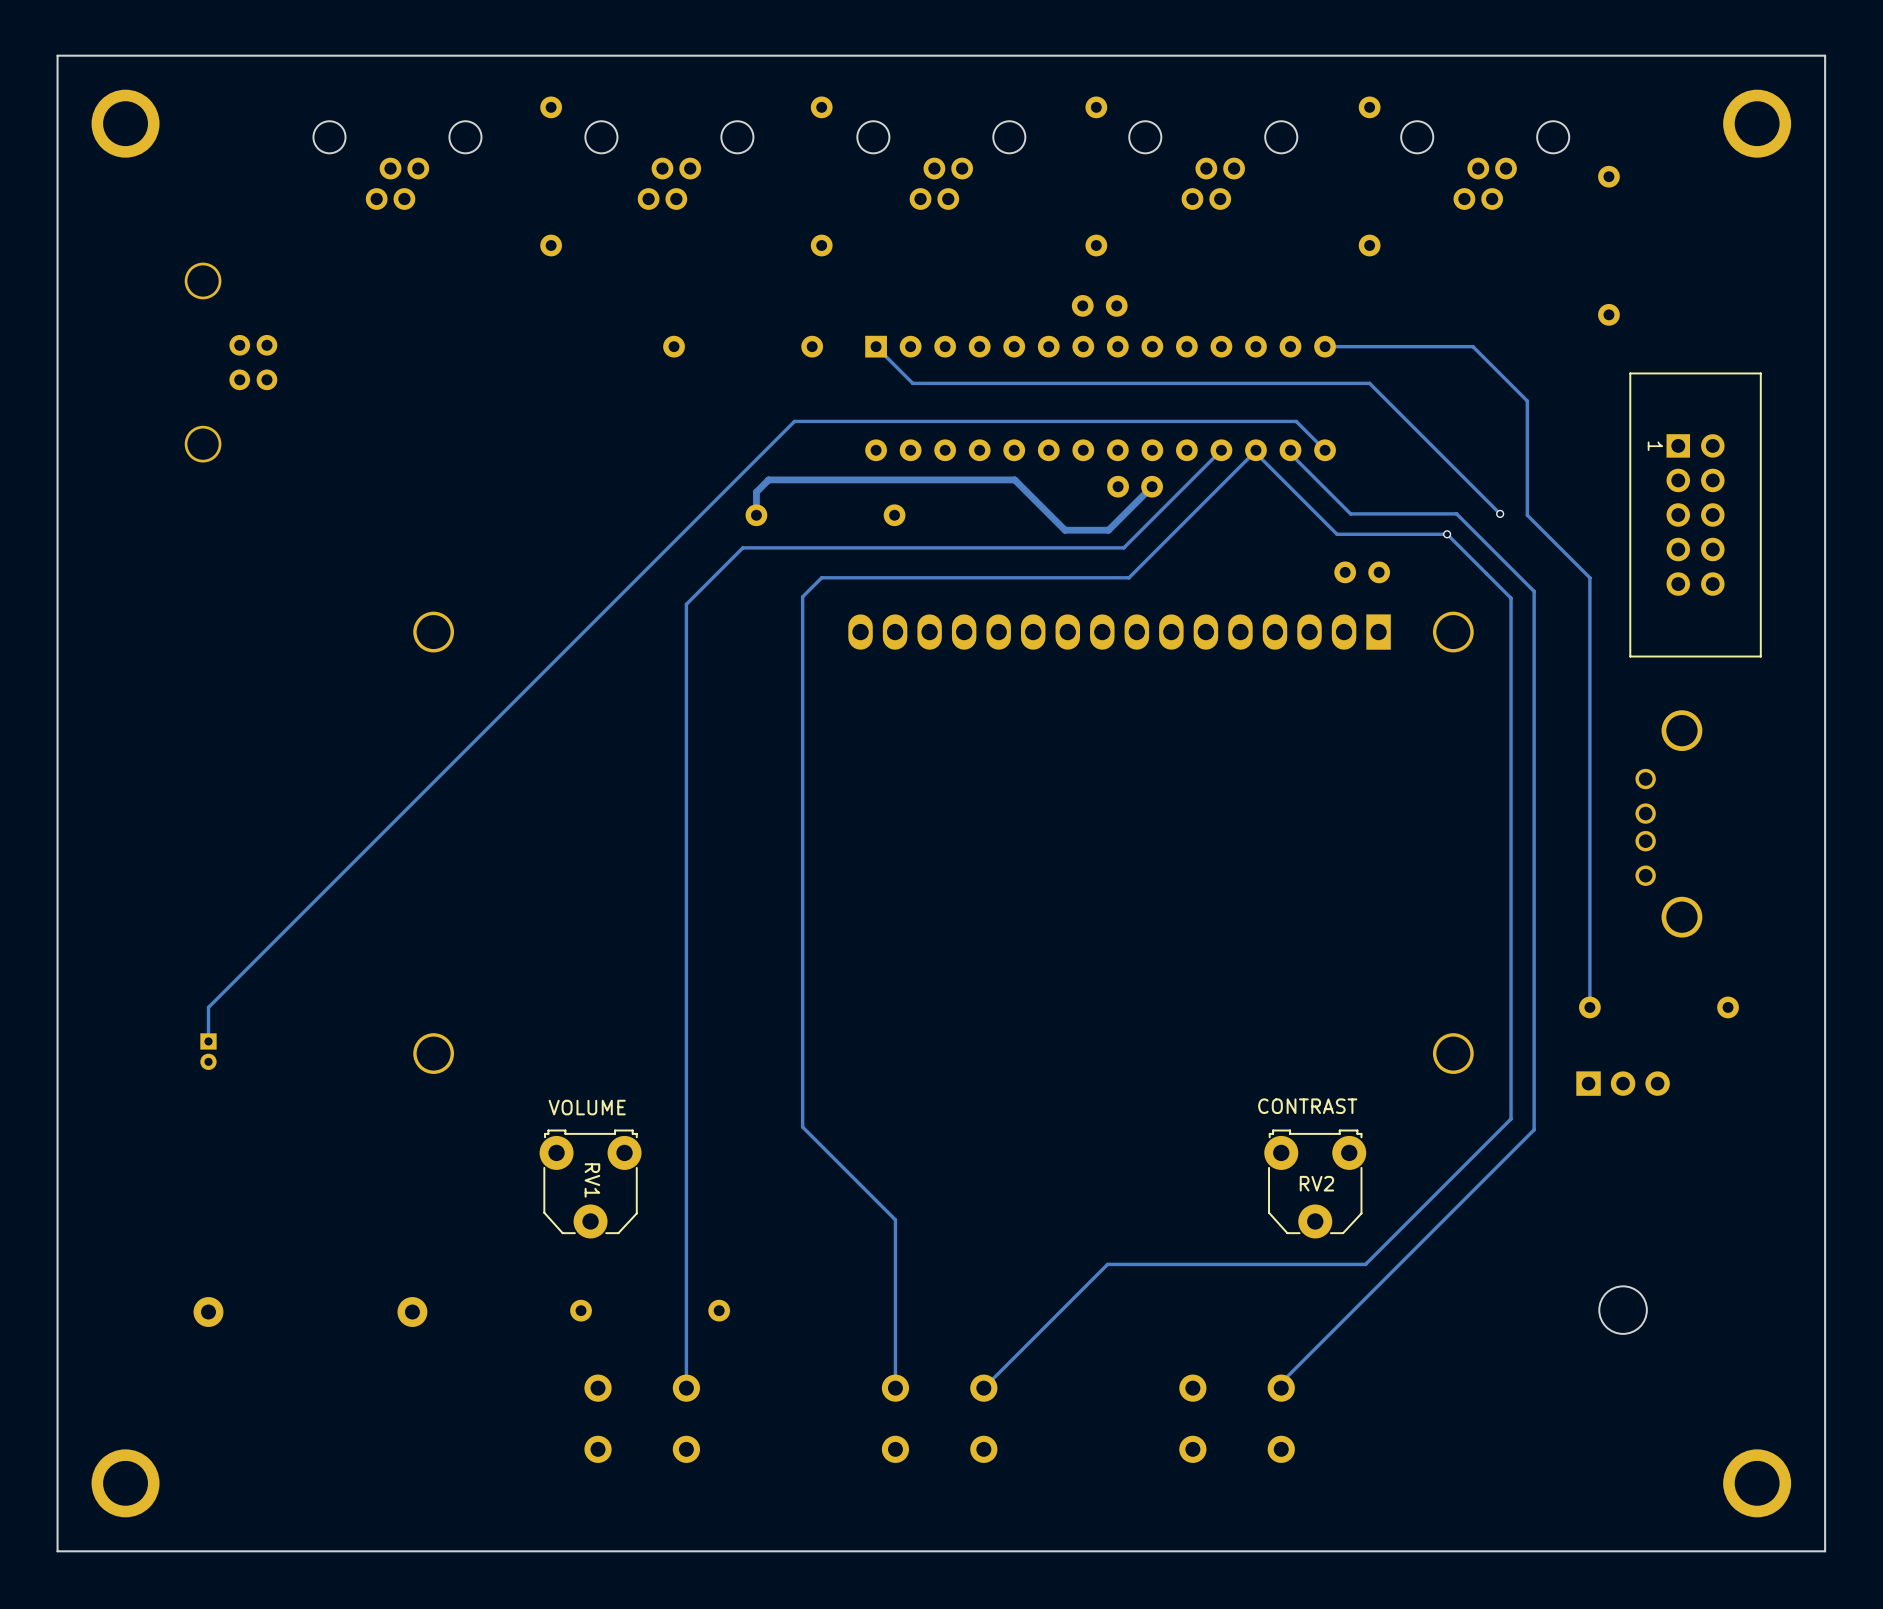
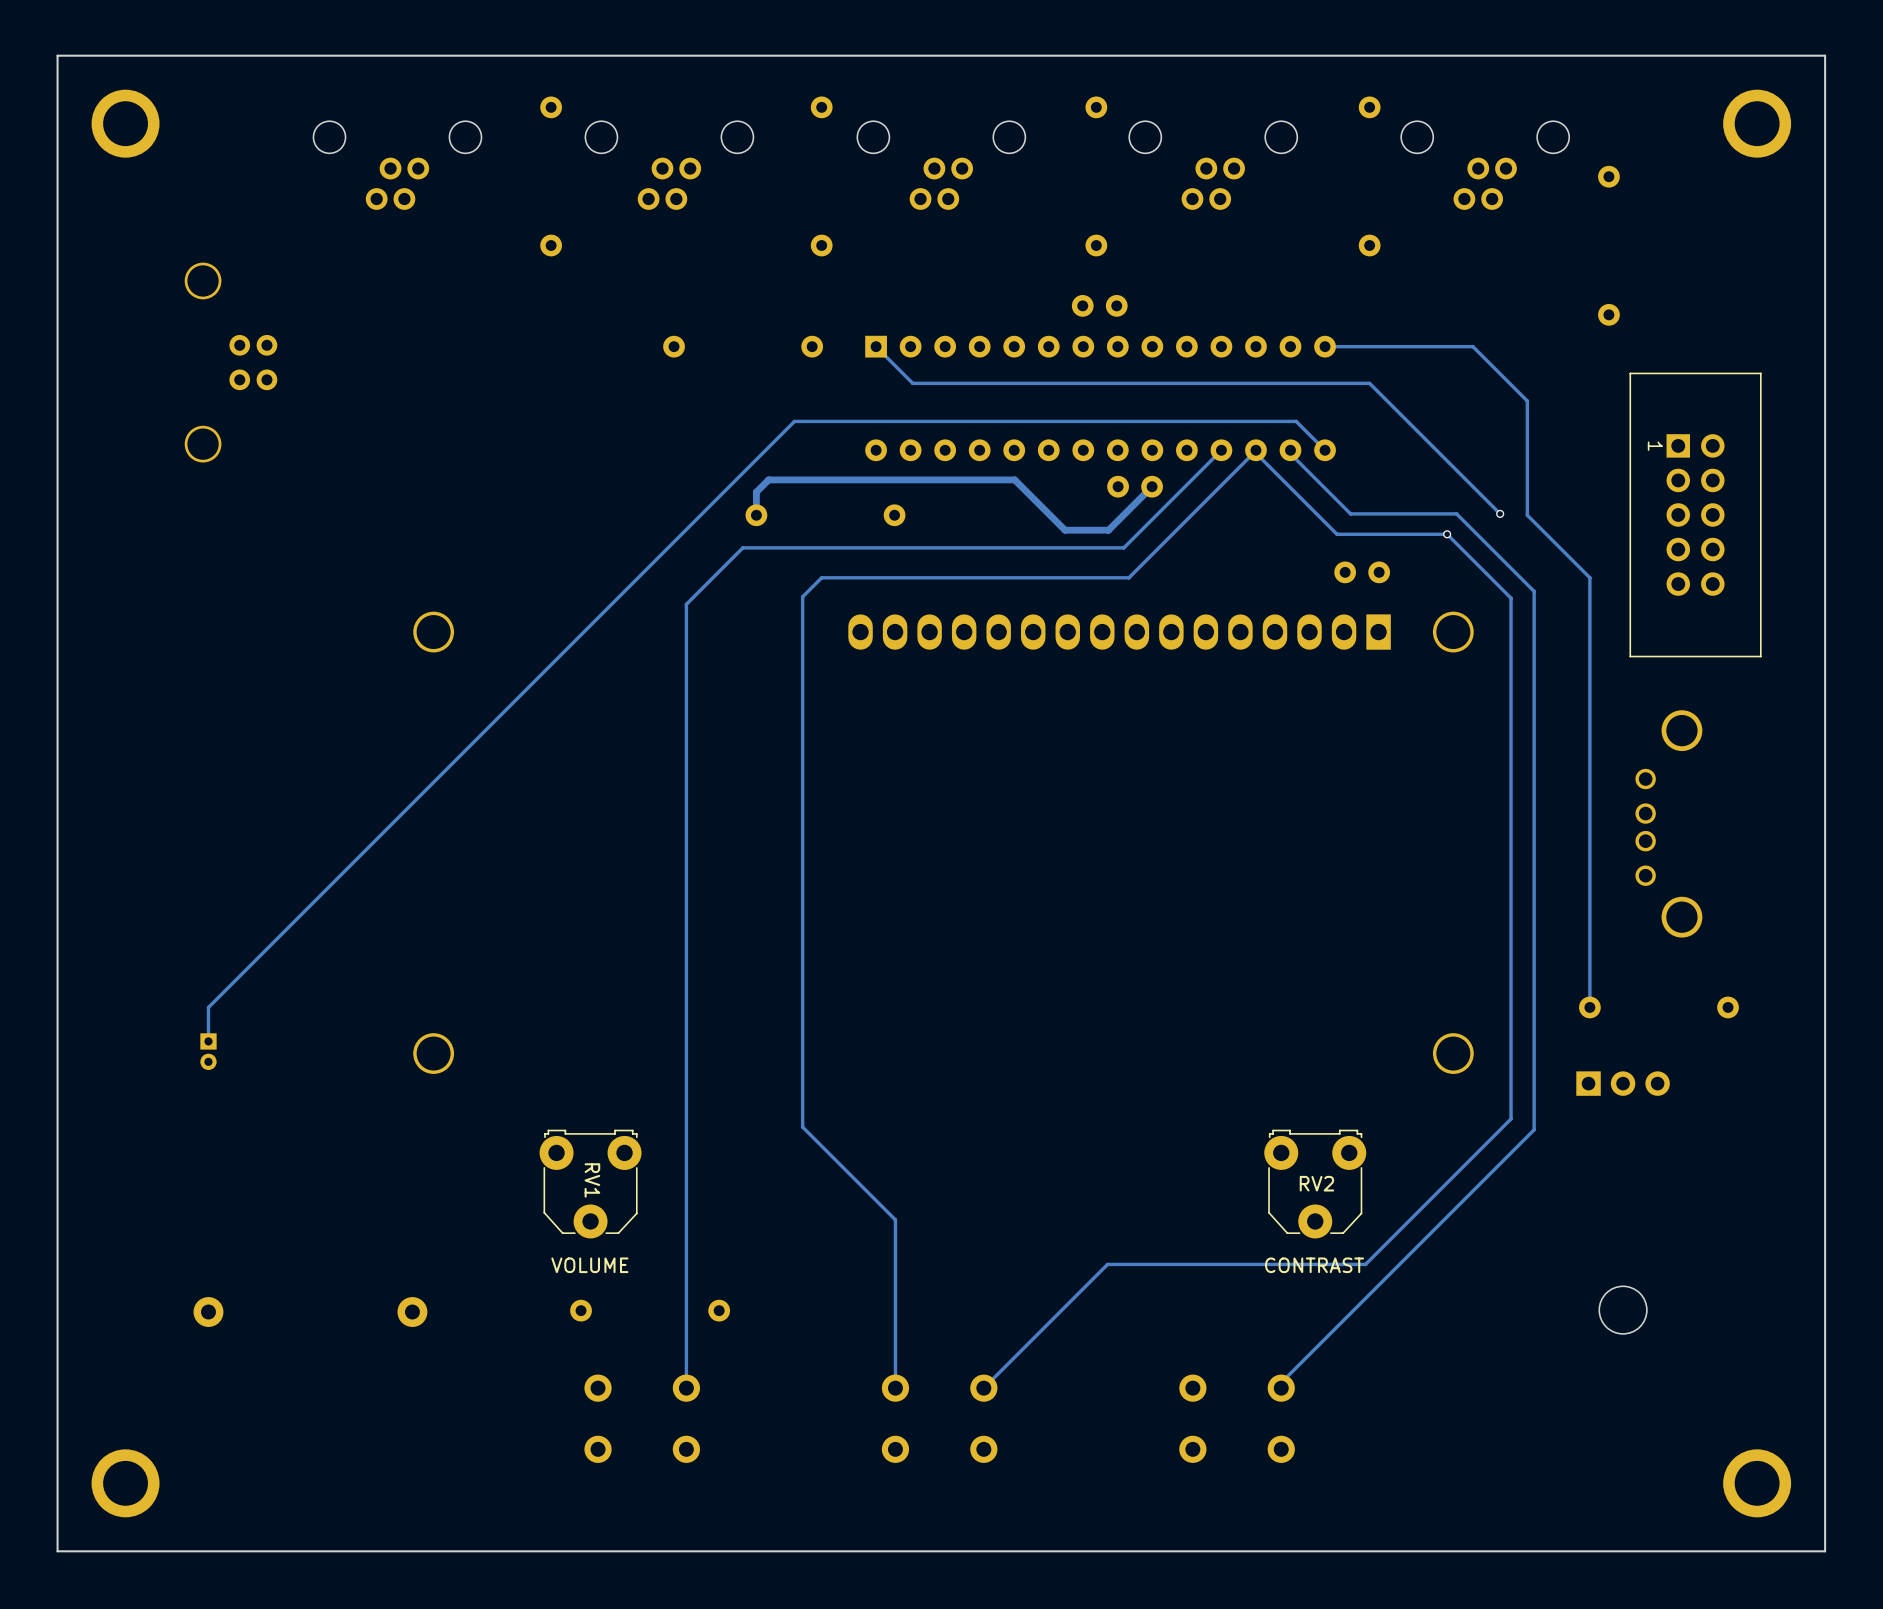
text position: CONTRAST (1307, 1106) -> CONTRAST (1314, 1265)
text position: VOLUME (587, 1107) -> VOLUME (589, 1265)

